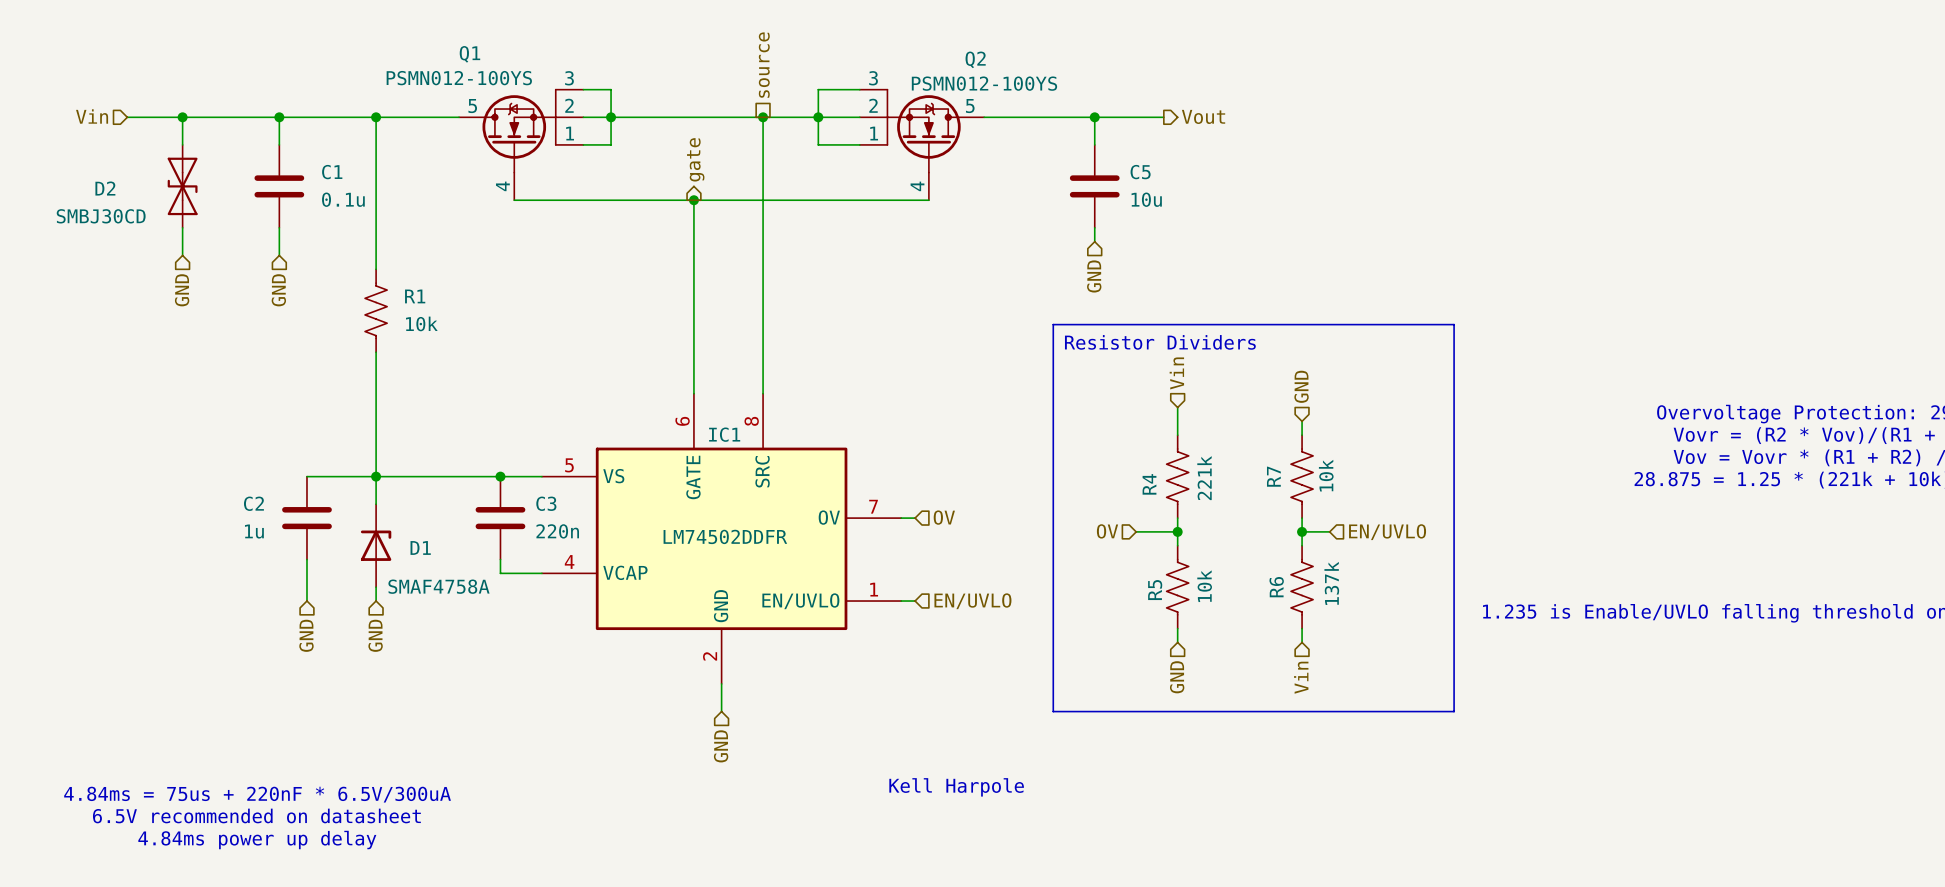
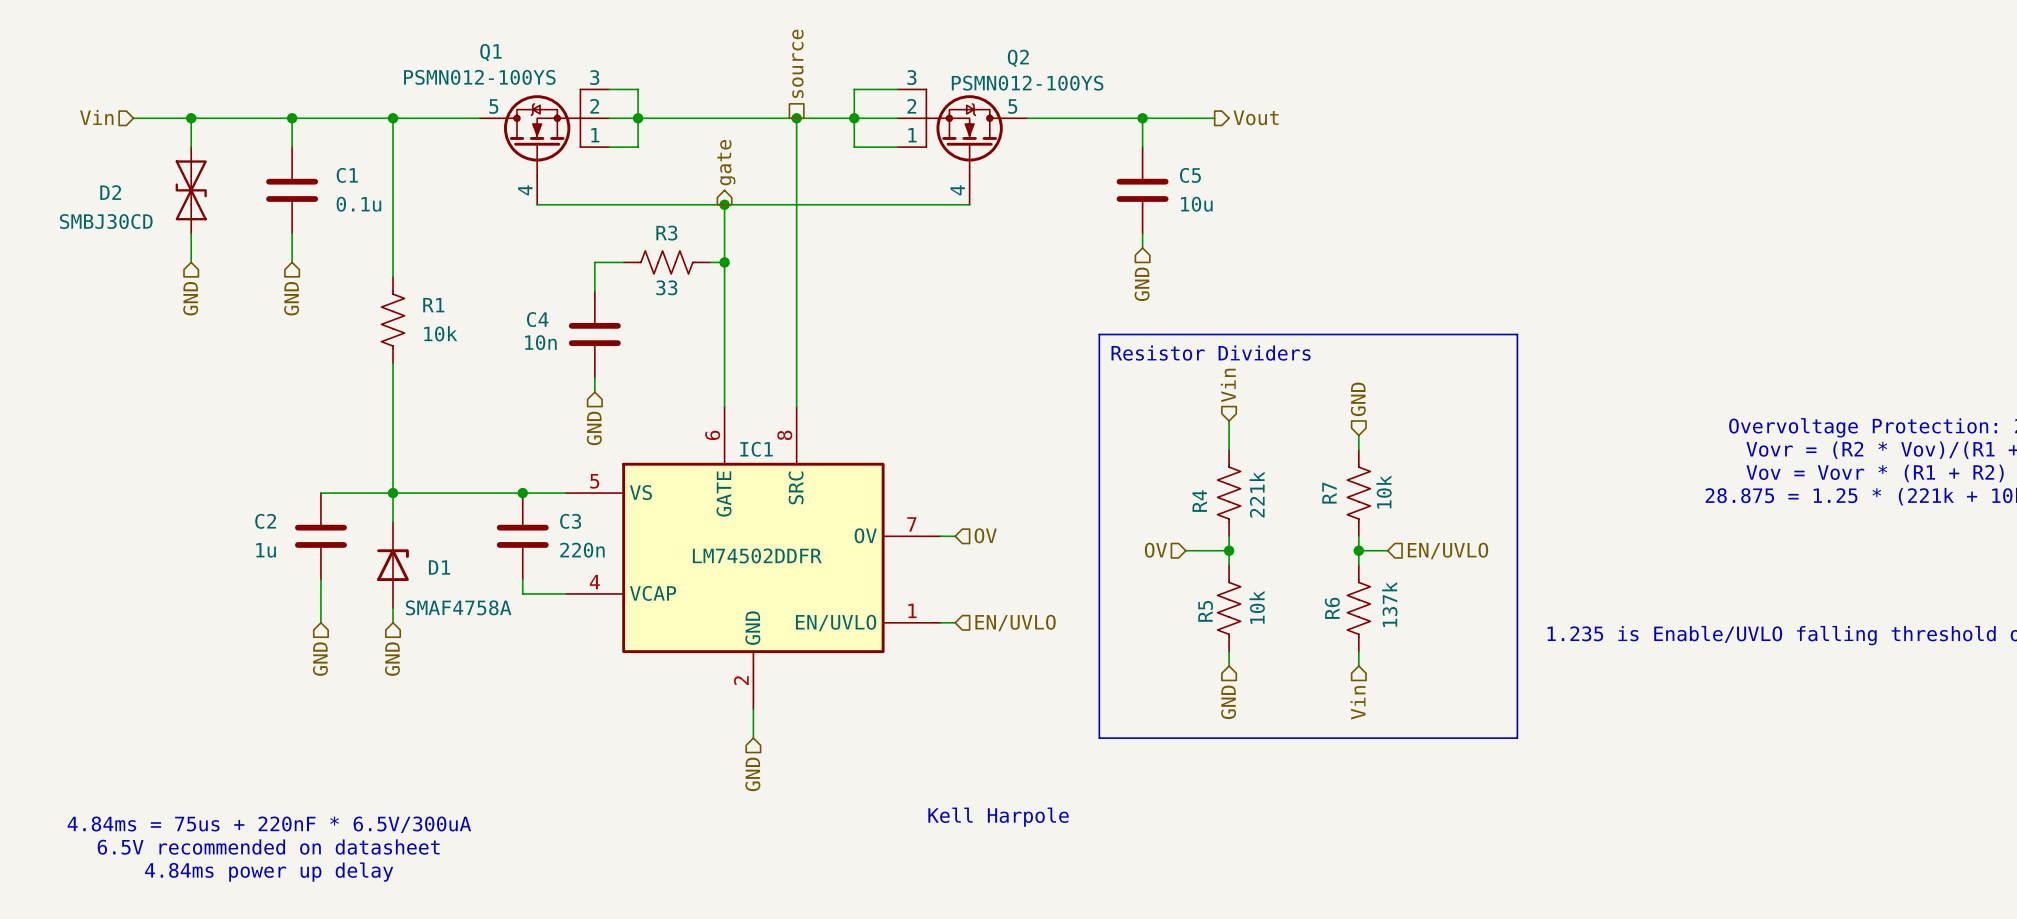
wire: none -> (623, 262) (594, 262) (594, 291)
R3: none -> 33 (666, 262)
wire: none -> (710, 262) (724, 262)
junction: none -> (724, 262)
C4: none -> 10n (594, 334)
wire: none -> (594, 377) (594, 392)
hierarchical label: none -> GND (594, 428)

